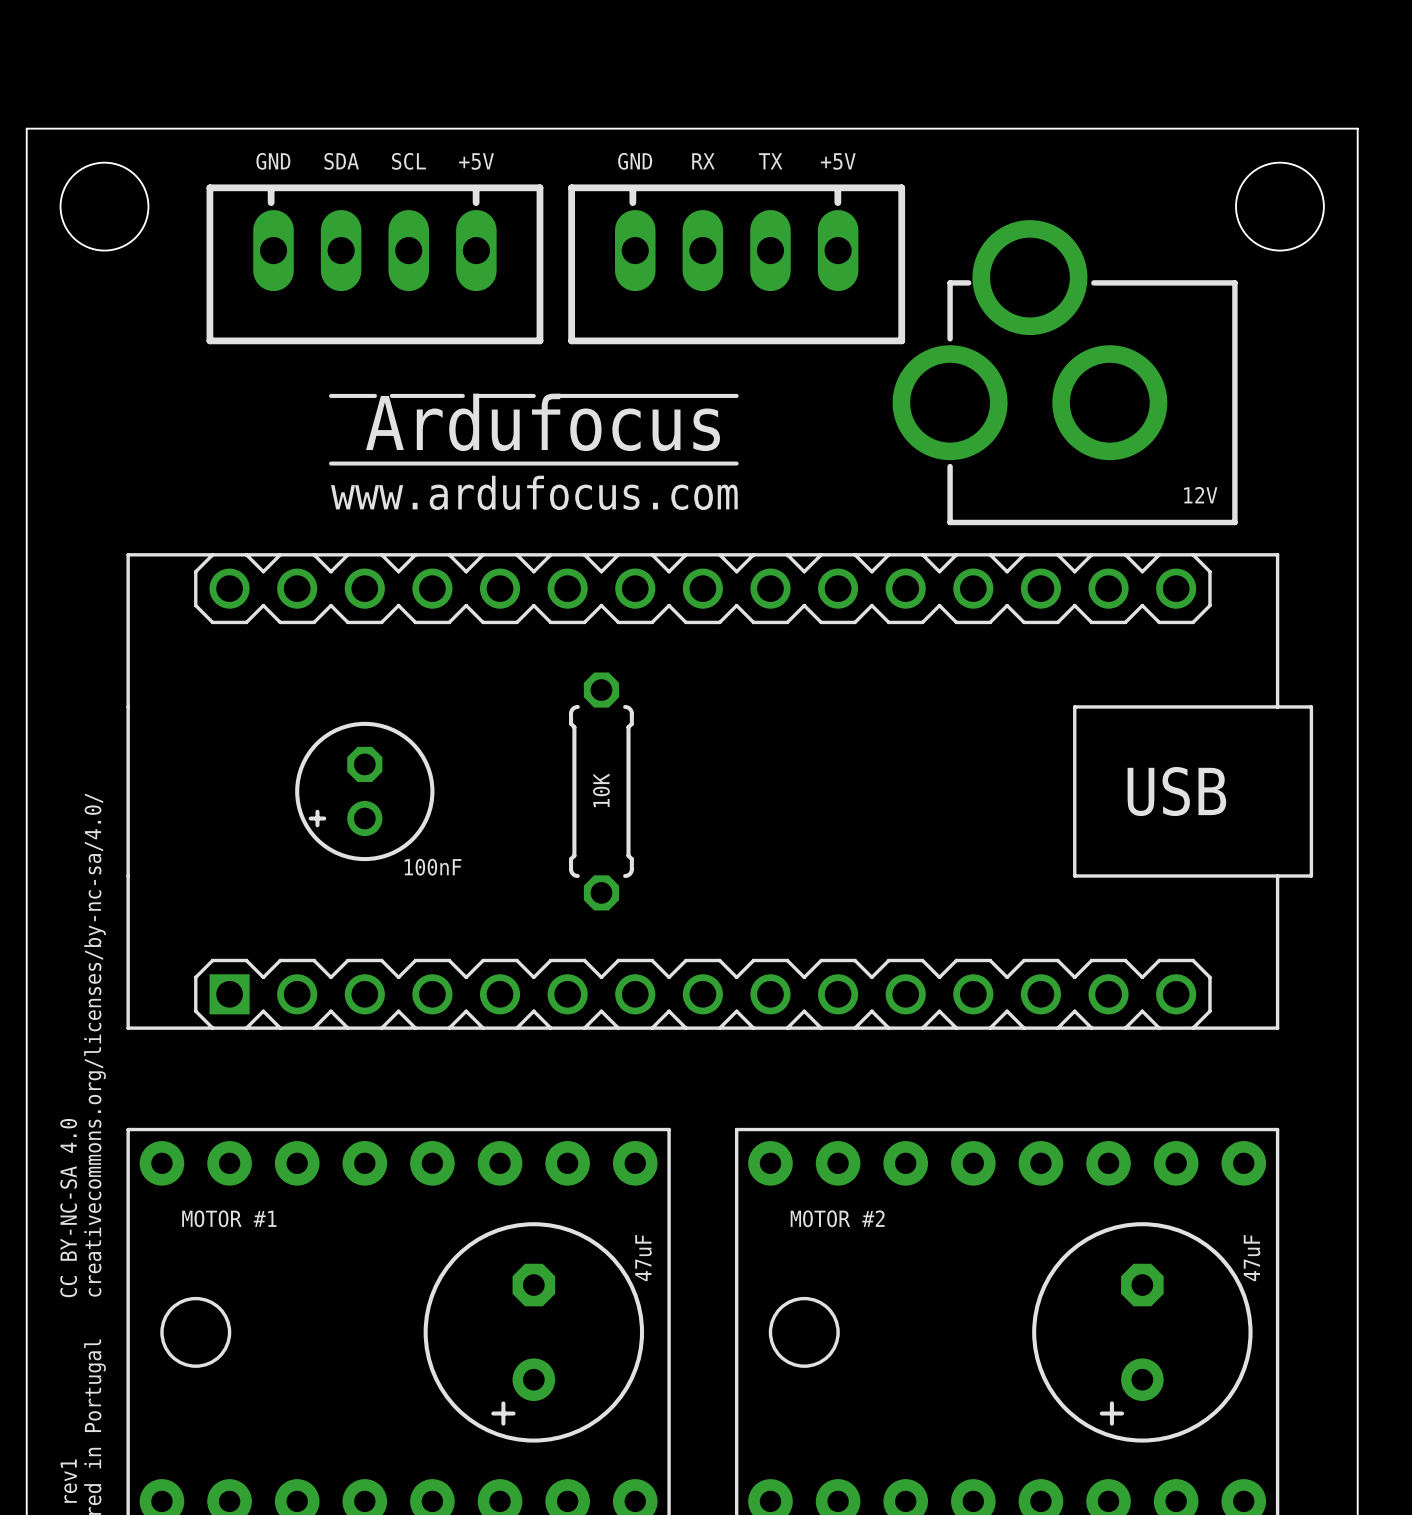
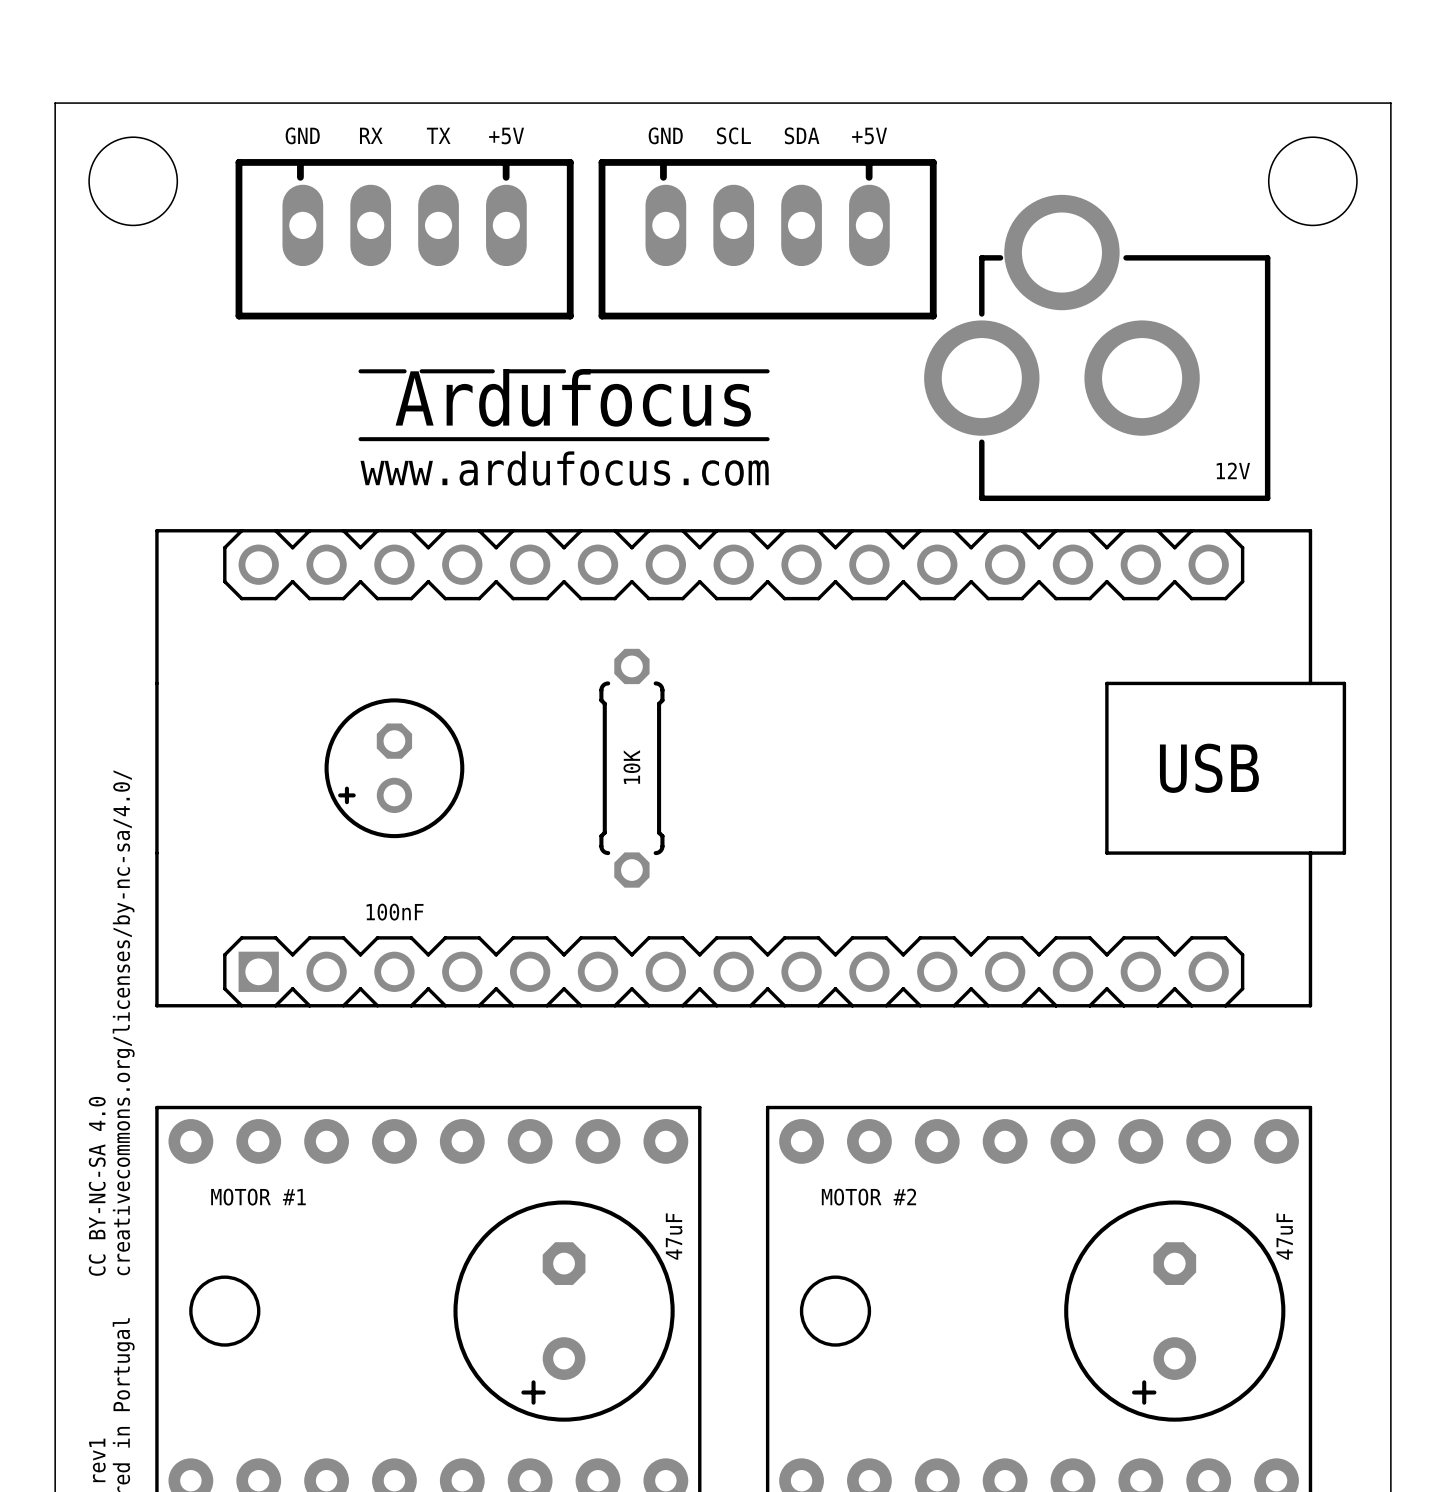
text: SDA (341, 161) -> RX (371, 135)
text: SCL (408, 161) -> TX (438, 135)
text: RX (703, 161) -> SCL (733, 135)
text: TX (770, 161) -> SDA (802, 135)
text position: 100nF (433, 867) -> 100nF (395, 912)

